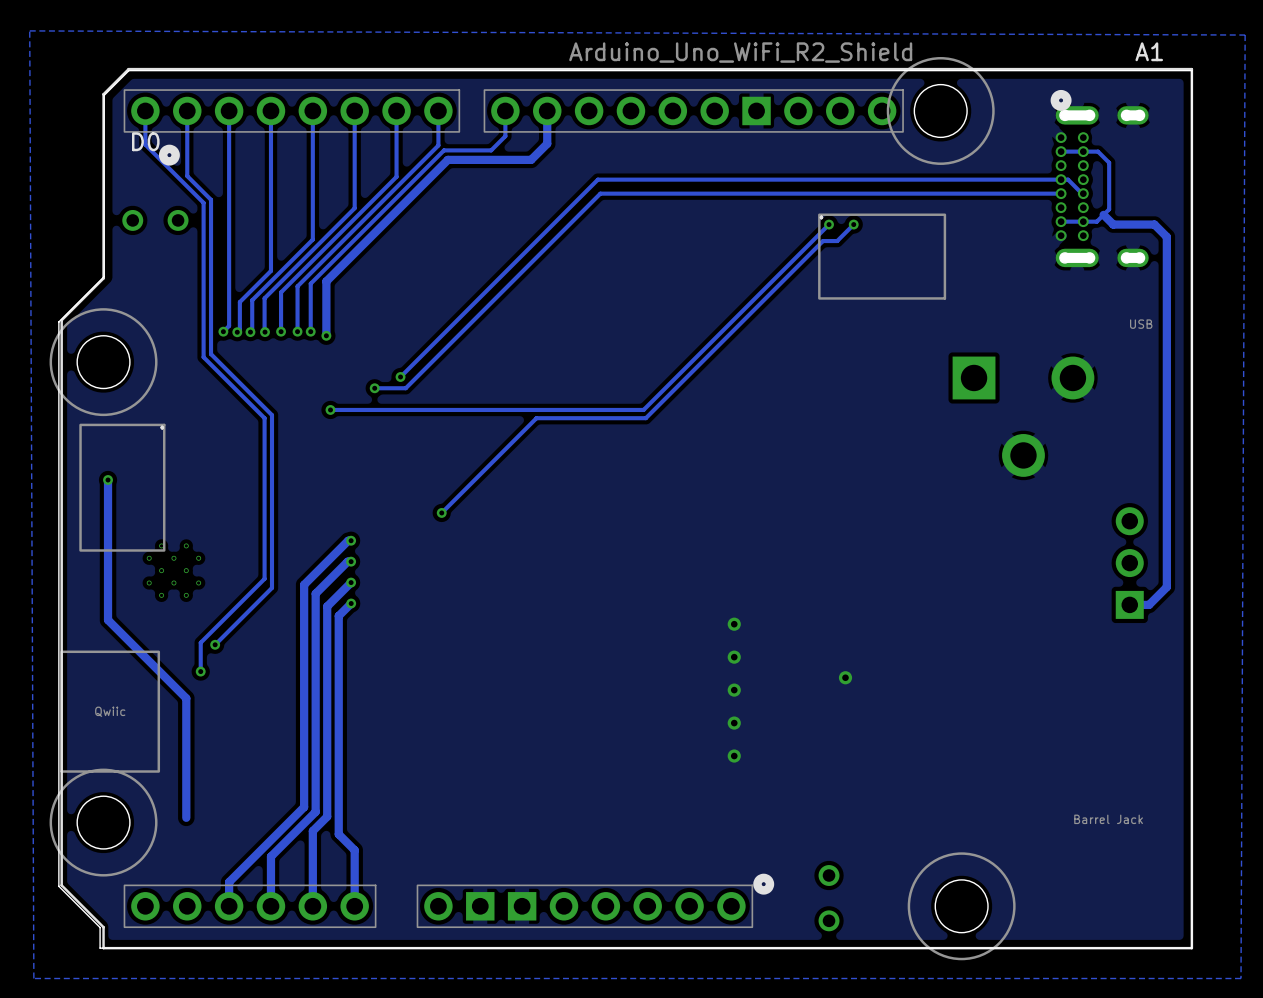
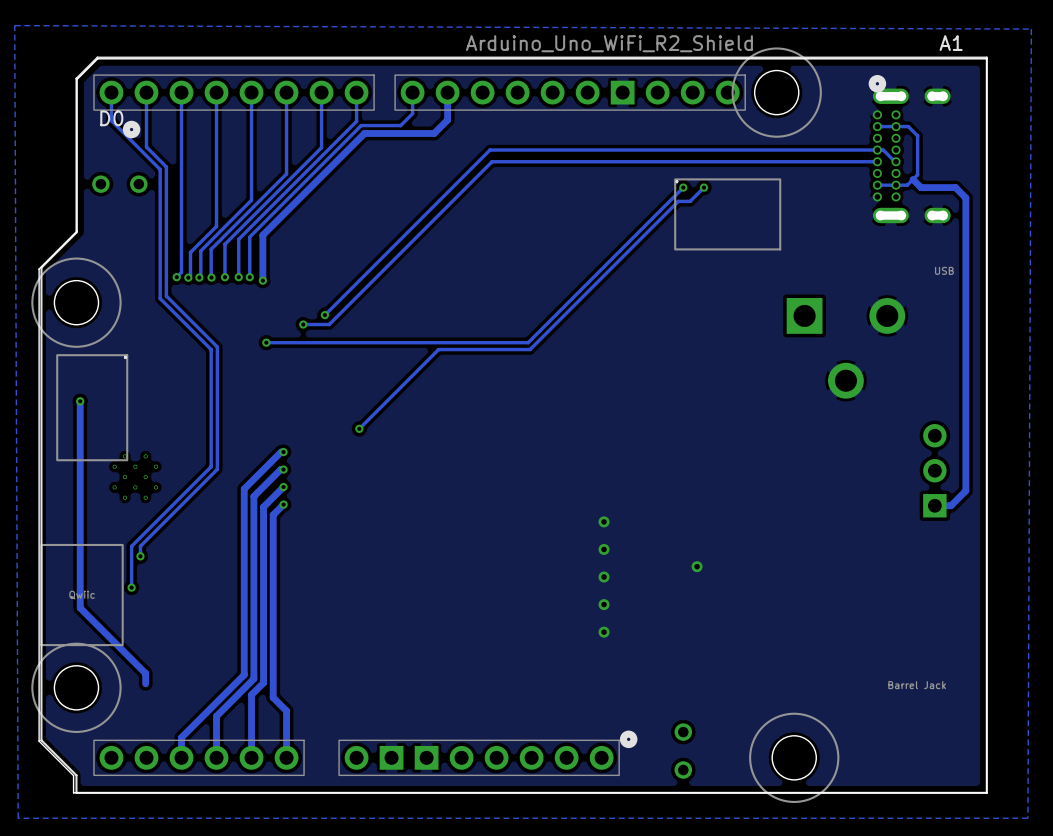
track: (264, 558) (264, 578) (200, 642) (200, 671) -> (211, 466) (131, 546) (131, 587)
track: (272, 561) (272, 587) (215, 644) -> (217, 469) (140, 546) (140, 556)
track: (108, 620) (186, 698) (186, 805) -> (80, 518) (80, 608) (145, 673)
via: (215, 644) -> none
via: none -> (140, 556)
via: (200, 671) -> none
via: none -> (131, 587)

